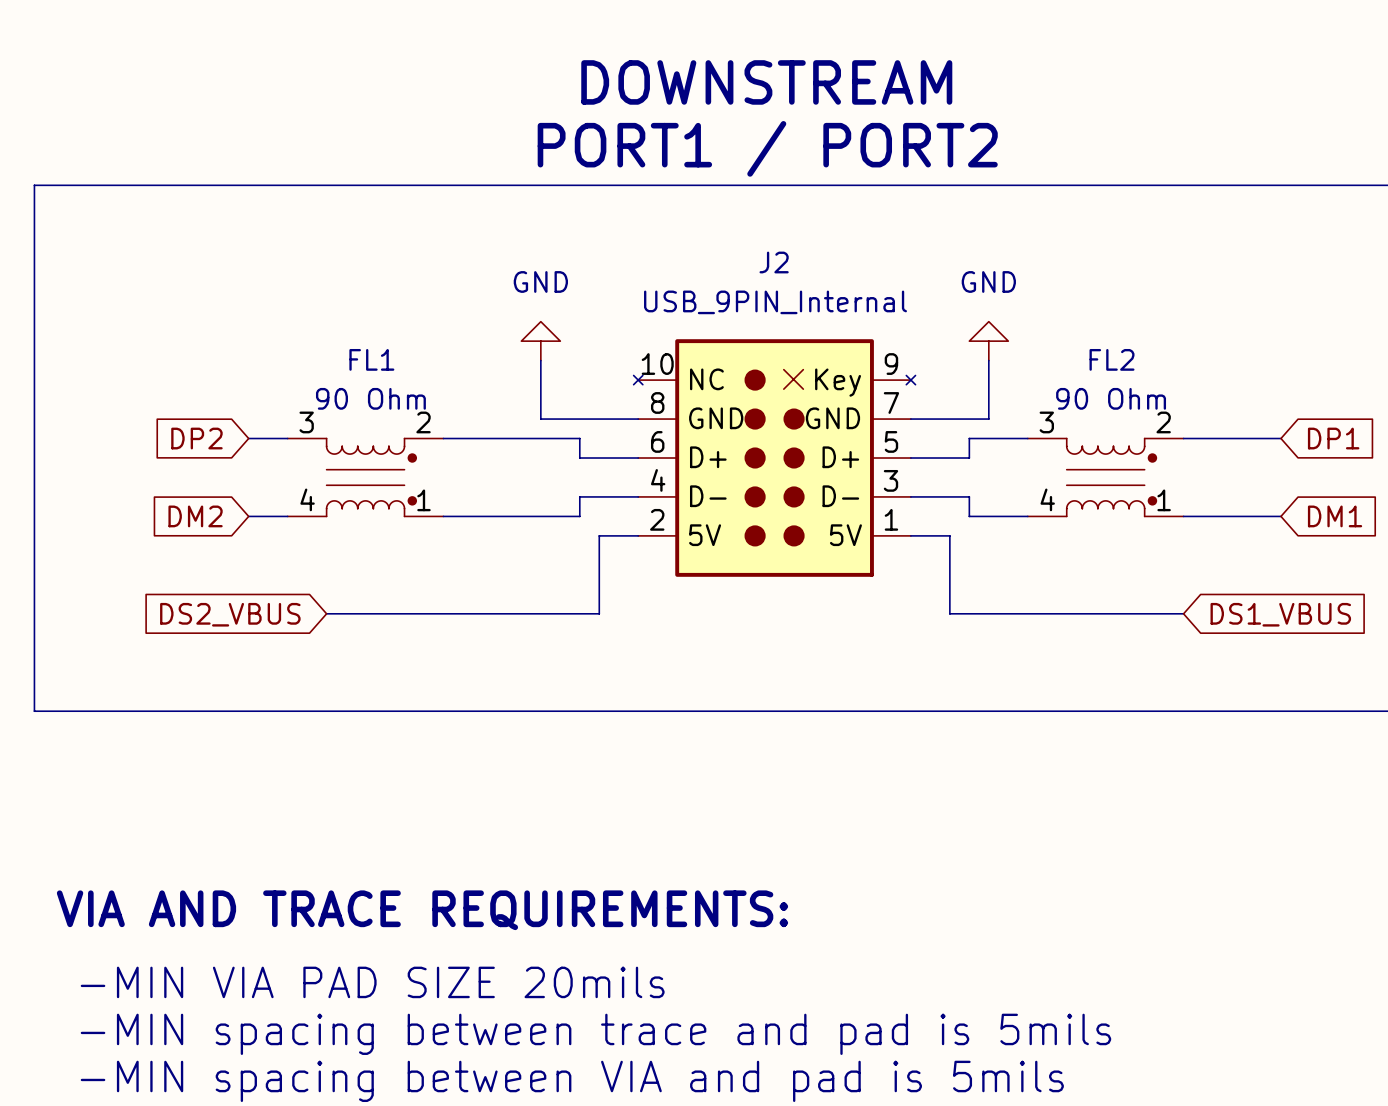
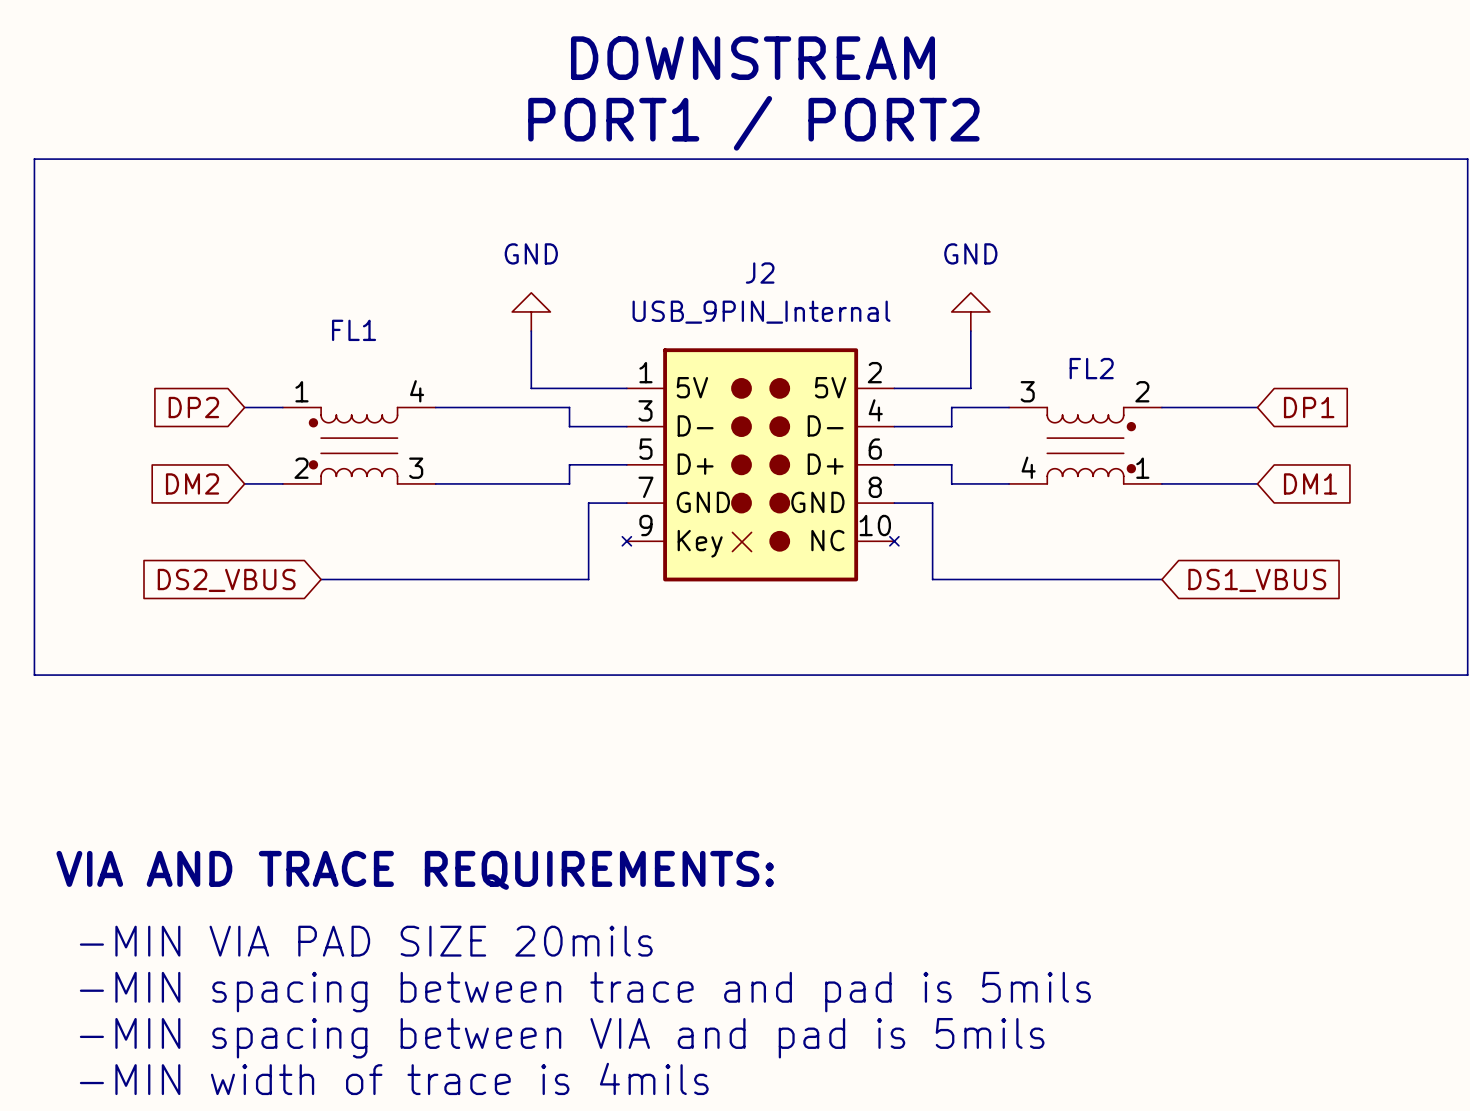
FL2 name position: FL2 (1111, 359) -> FL2 (1091, 368)
FL1 value: 90 Ohm (370, 398) -> none
FL2 value: 90 Ohm (1111, 398) -> none
J2 rotation: 0° (774, 458) -> 180° (760, 464)
FL1 rotation: 0° (371, 477) -> 180° (353, 445)

